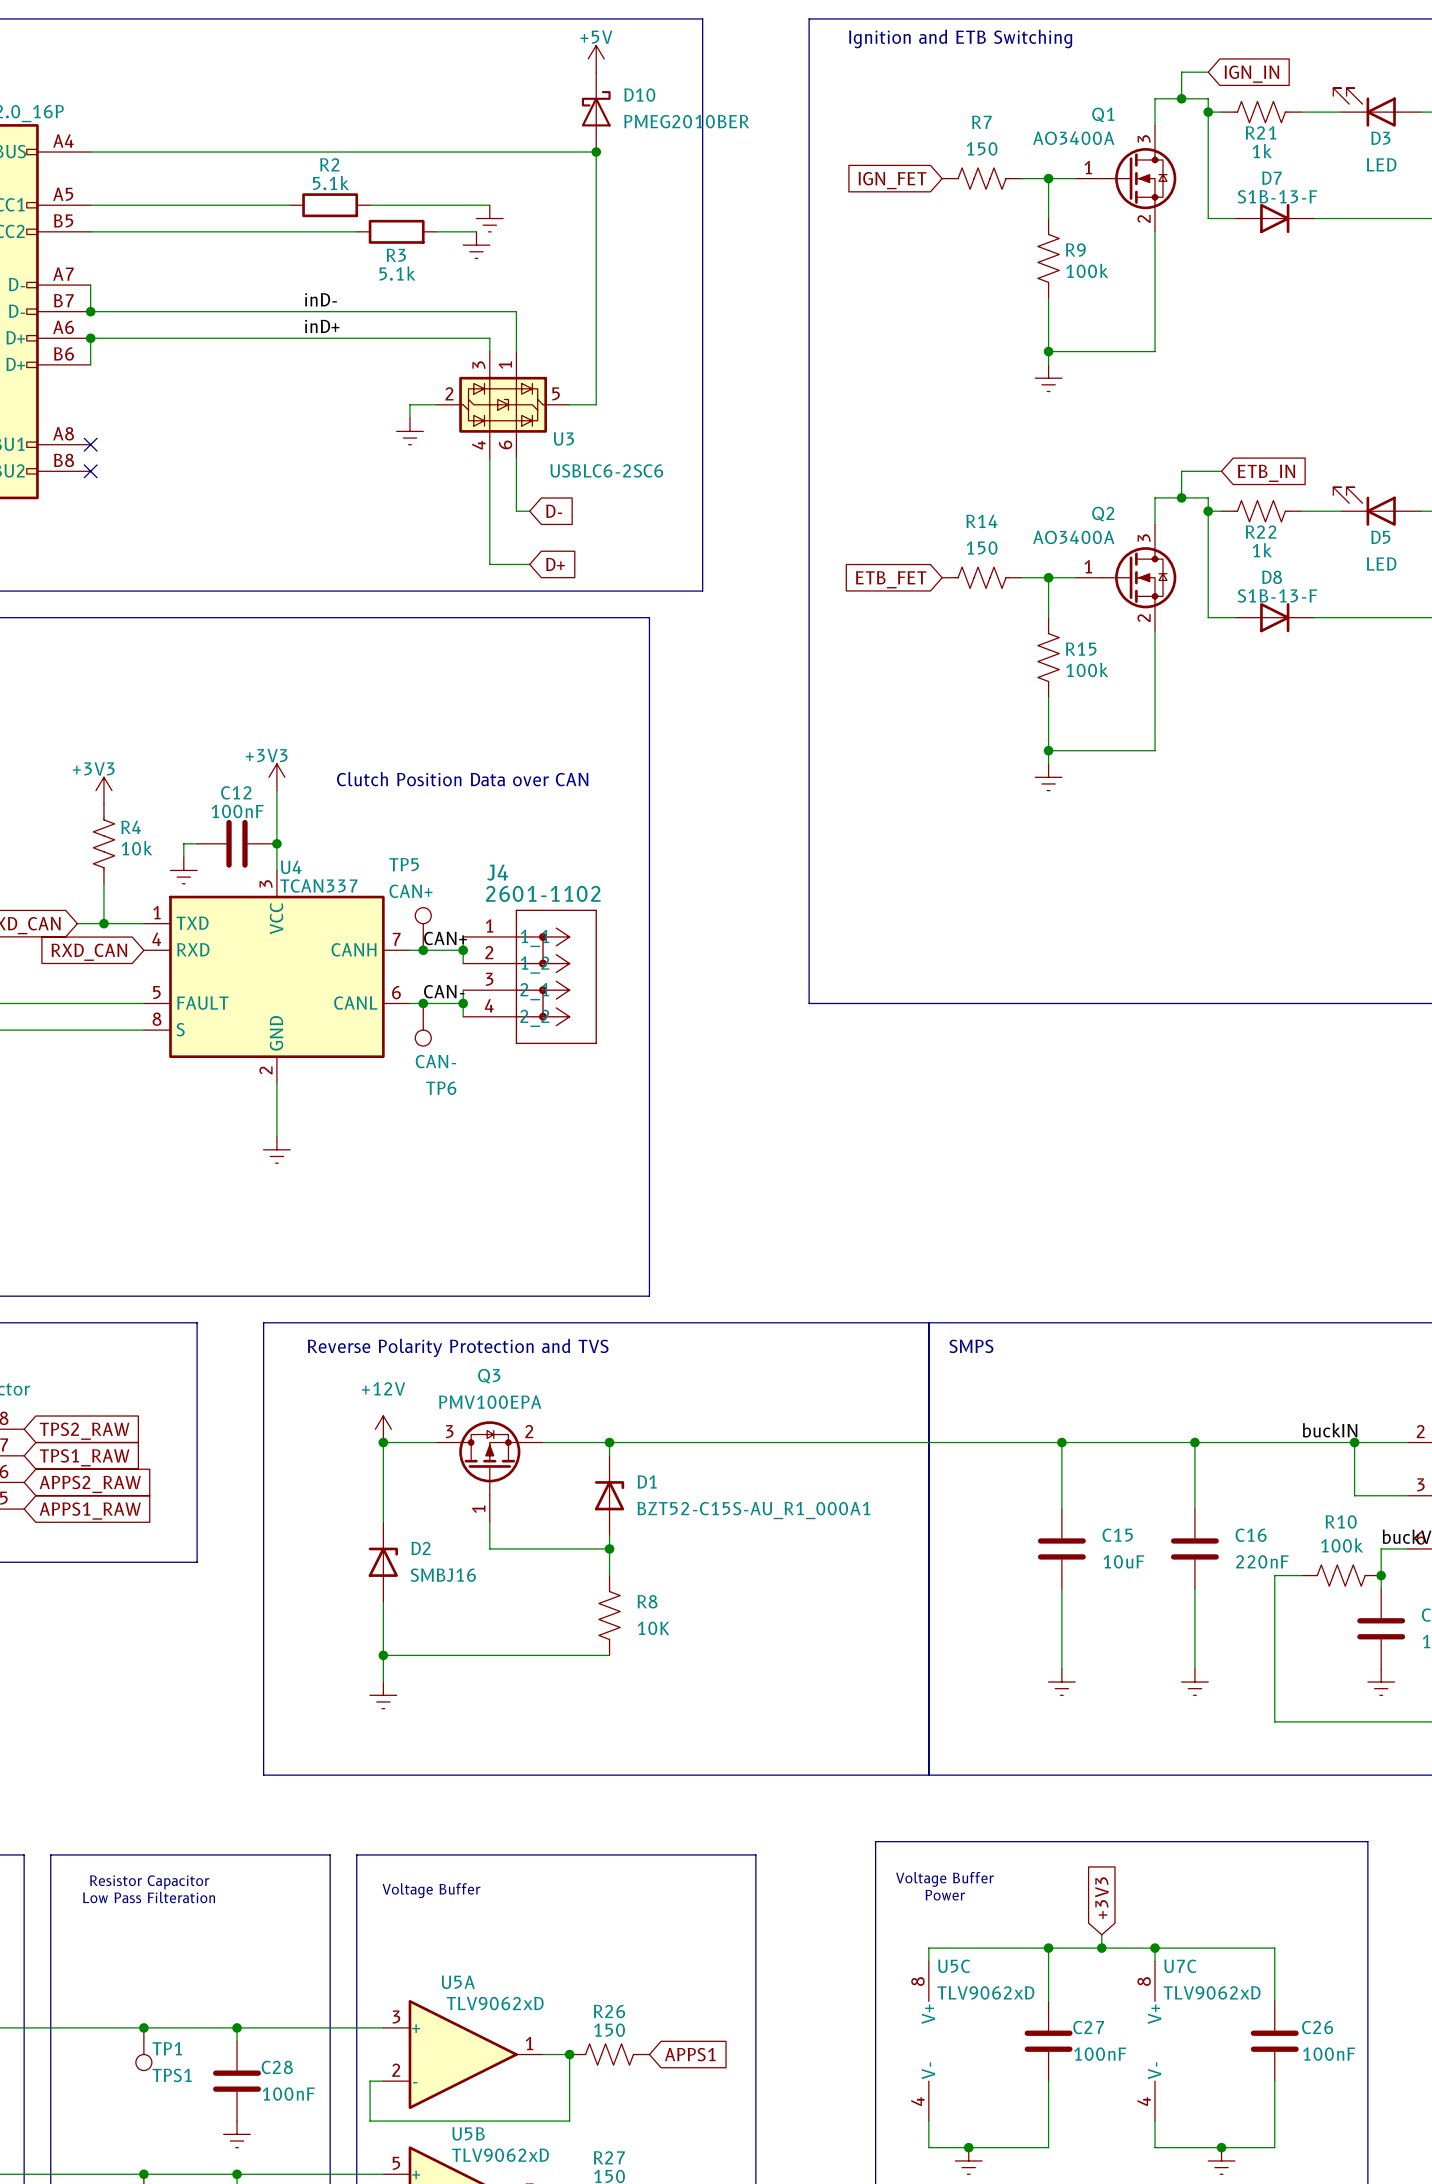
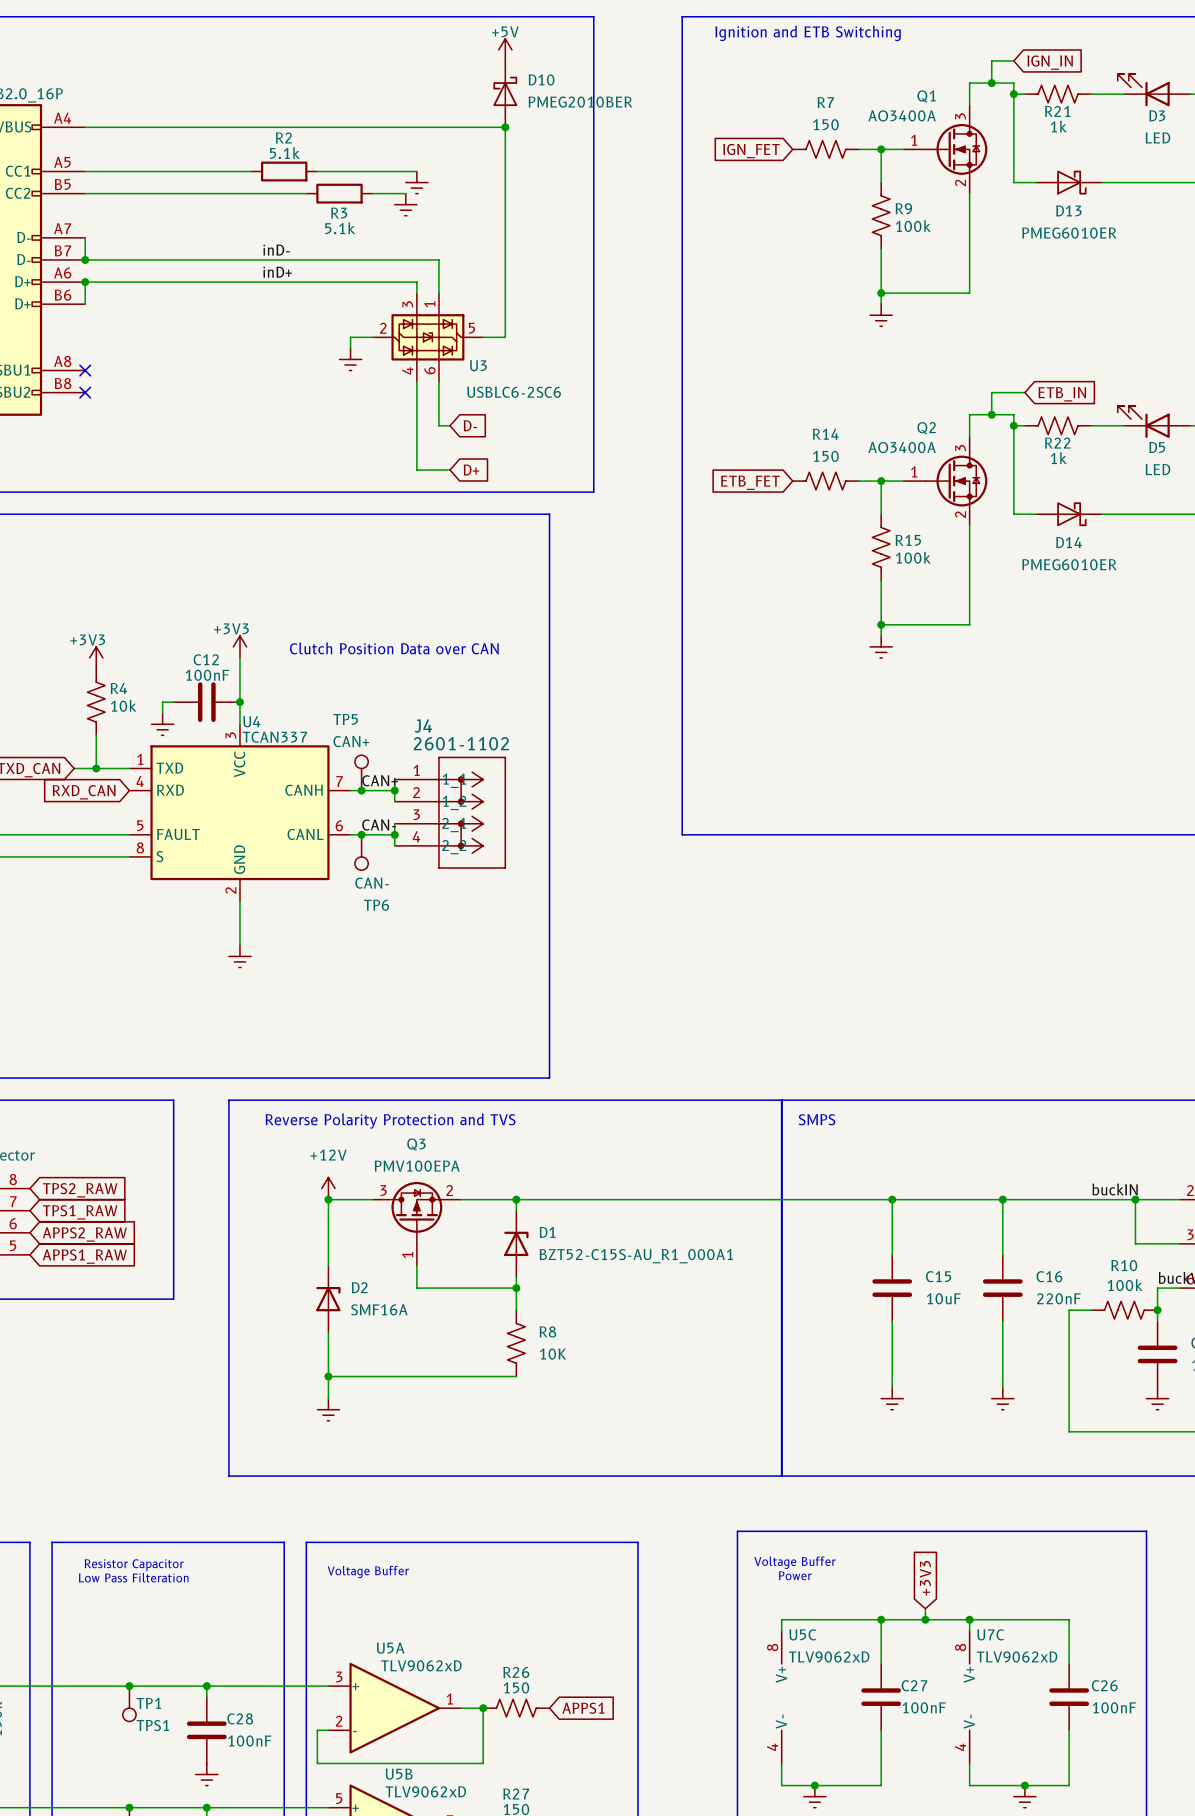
D7: S1B-13-F (1274, 218) -> none
D13: none -> PMEG6010ER (1069, 182)
D8: S1B-13-F (1274, 617) -> none
D14: none -> PMEG6010ER (1069, 514)
D2 value: SMBJ16 (443, 1575) -> SMF16A (379, 1309)

